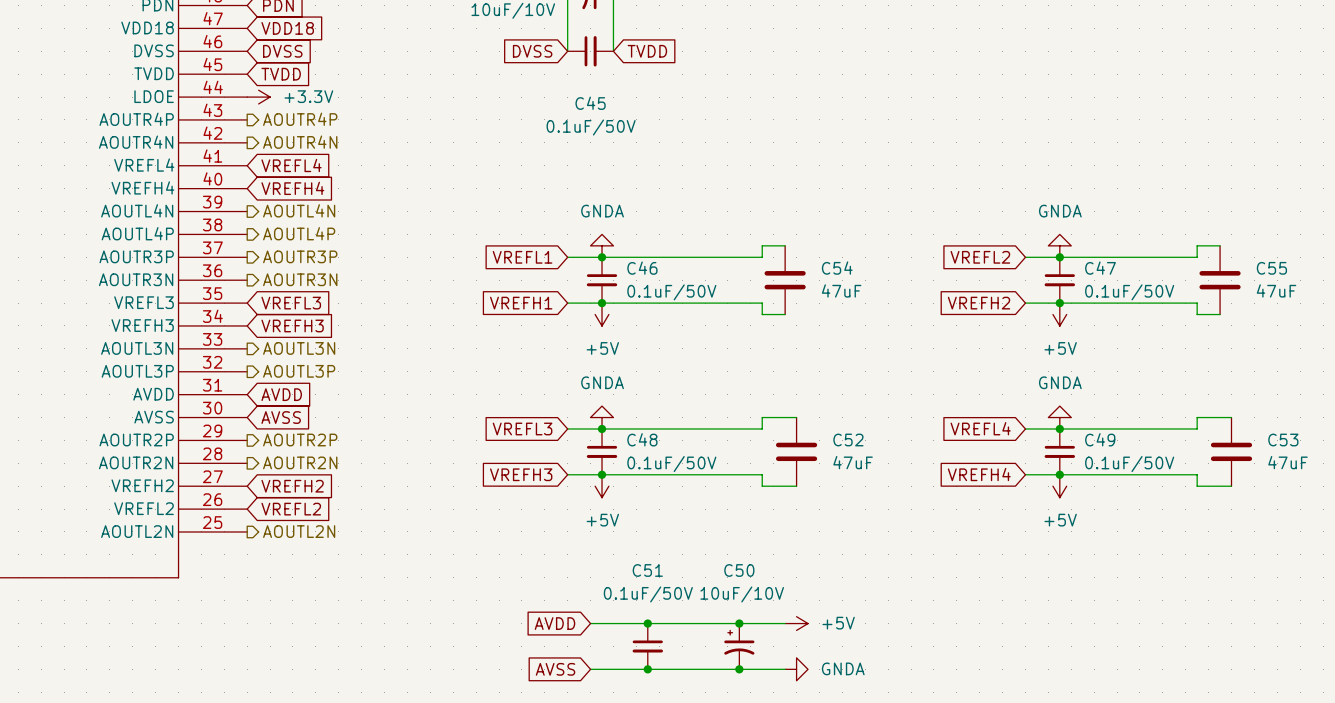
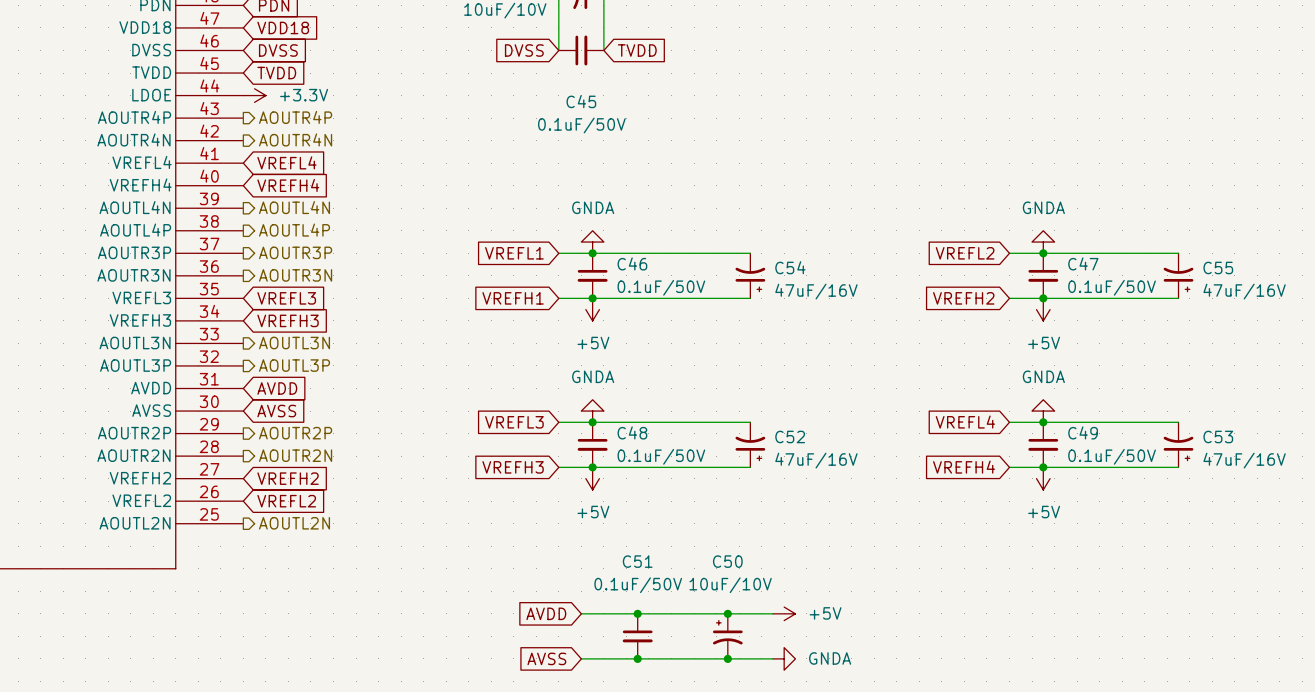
C54 symbol: [764, 245, 806, 315] -> [735, 253, 766, 299]
wire: (785, 245) (762, 245) (762, 257) -> none
C55 symbol: [1199, 245, 1241, 315] -> [1163, 253, 1194, 299]
wire: (1220, 245) (1197, 245) (1197, 257) -> none
C54 value: 47uF (841, 290) -> none
C55 value: 47uF (1276, 290) -> none
C54 text: none -> 47uF/16V (816, 291)
C55 text: none -> 47uF/16V (1244, 291)
wire: (762, 303) (762, 314) (785, 314) -> none
wire: (1197, 303) (1197, 314) (1220, 314) -> none
C52 symbol: [775, 417, 818, 487] -> [735, 422, 766, 468]
wire: (796, 417) (762, 417) (762, 428) -> none
C53 symbol: [1210, 417, 1253, 487] -> [1163, 422, 1194, 468]
wire: (1231, 417) (1197, 417) (1197, 428) -> none
C52 value: 47uF (853, 462) -> none
C53 value: 47uF (1287, 462) -> none
C52 text: none -> 47uF/16V (816, 460)
C53 text: none -> 47uF/16V (1244, 460)
wire: (762, 474) (762, 486) (796, 486) -> none
wire: (1197, 474) (1197, 486) (1231, 486) -> none

